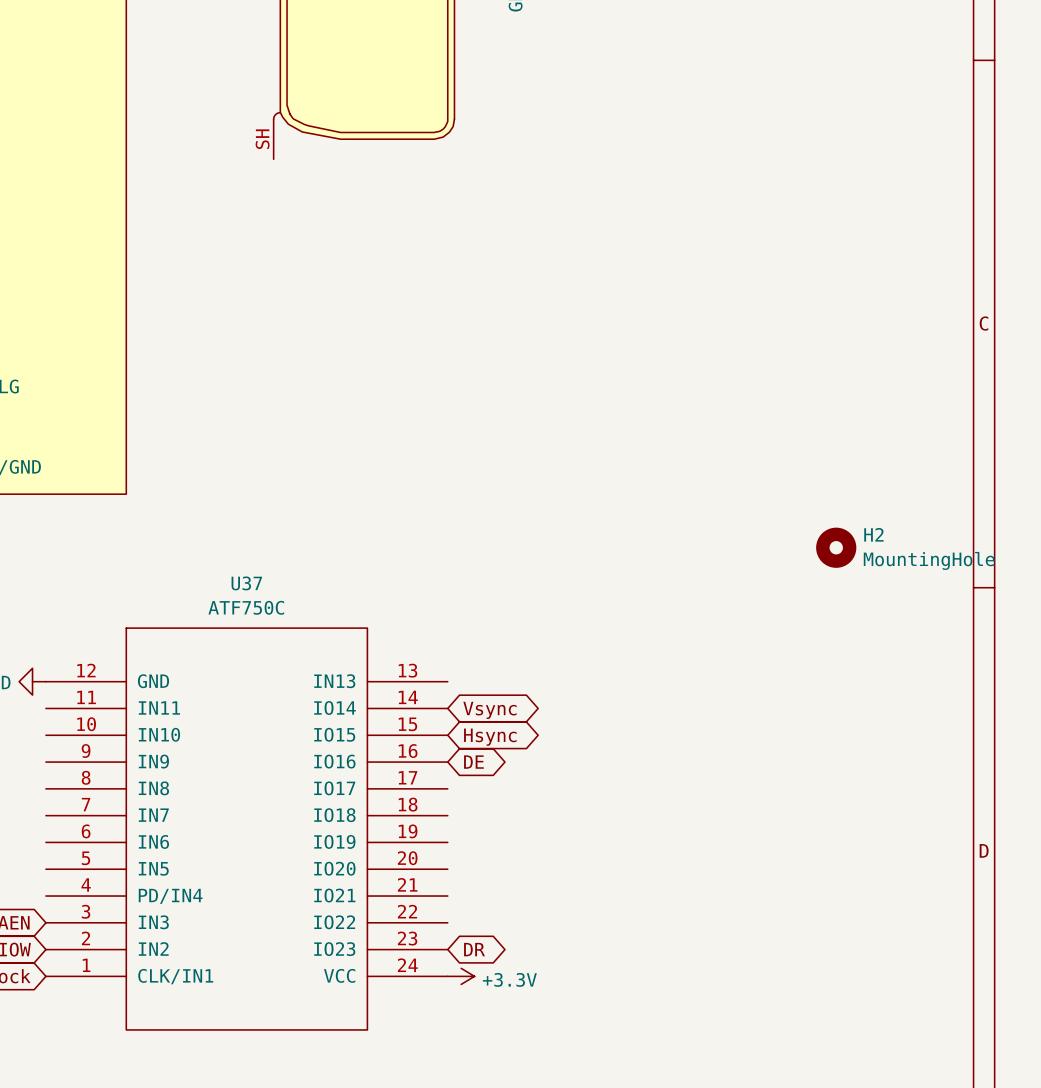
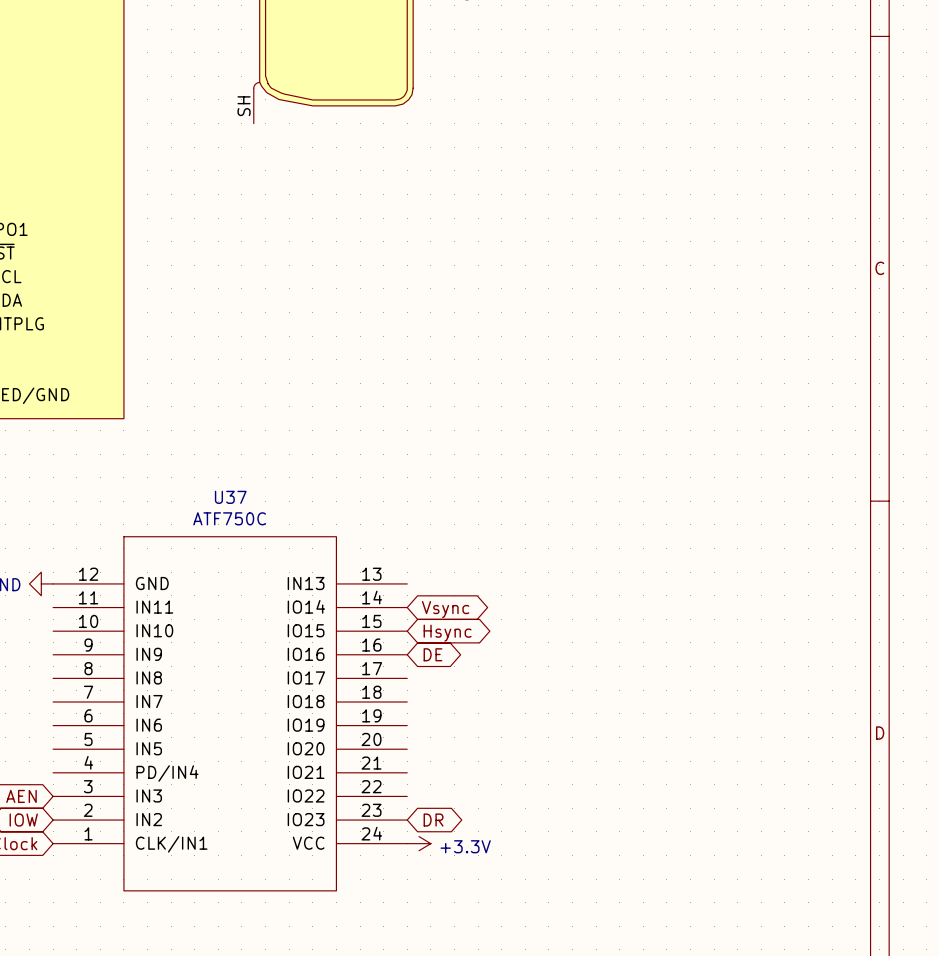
H2: MountingHole (836, 547) -> none

